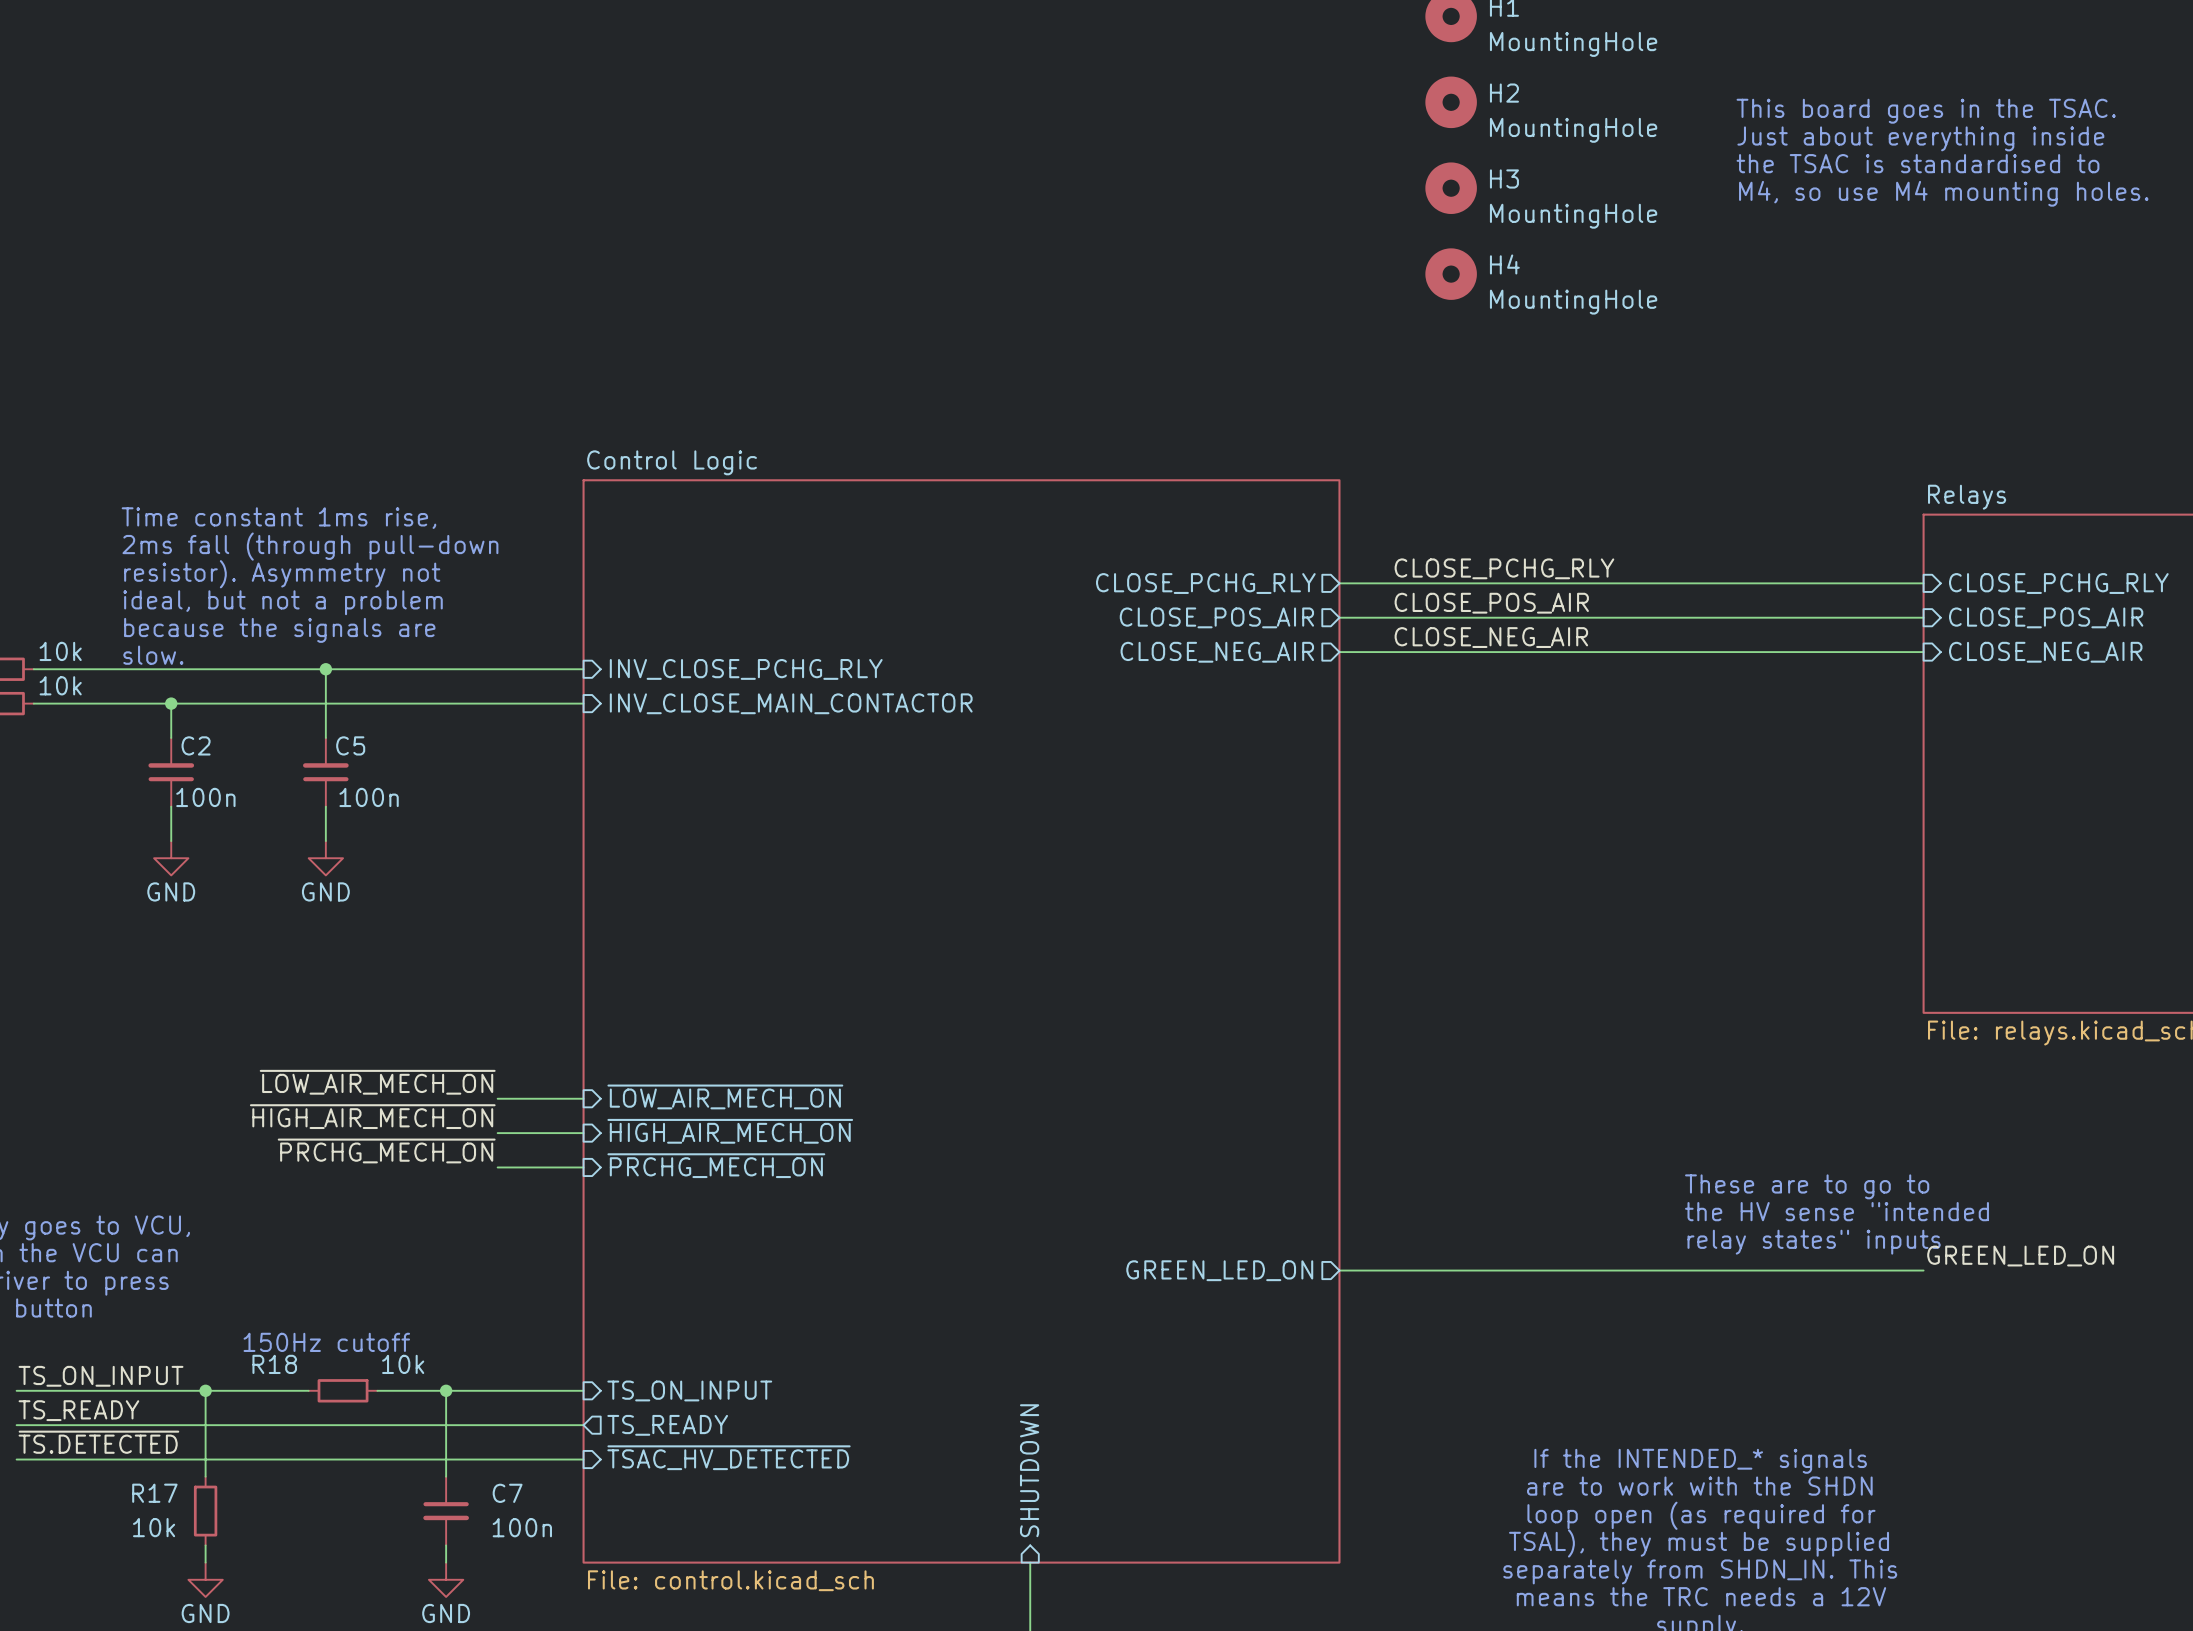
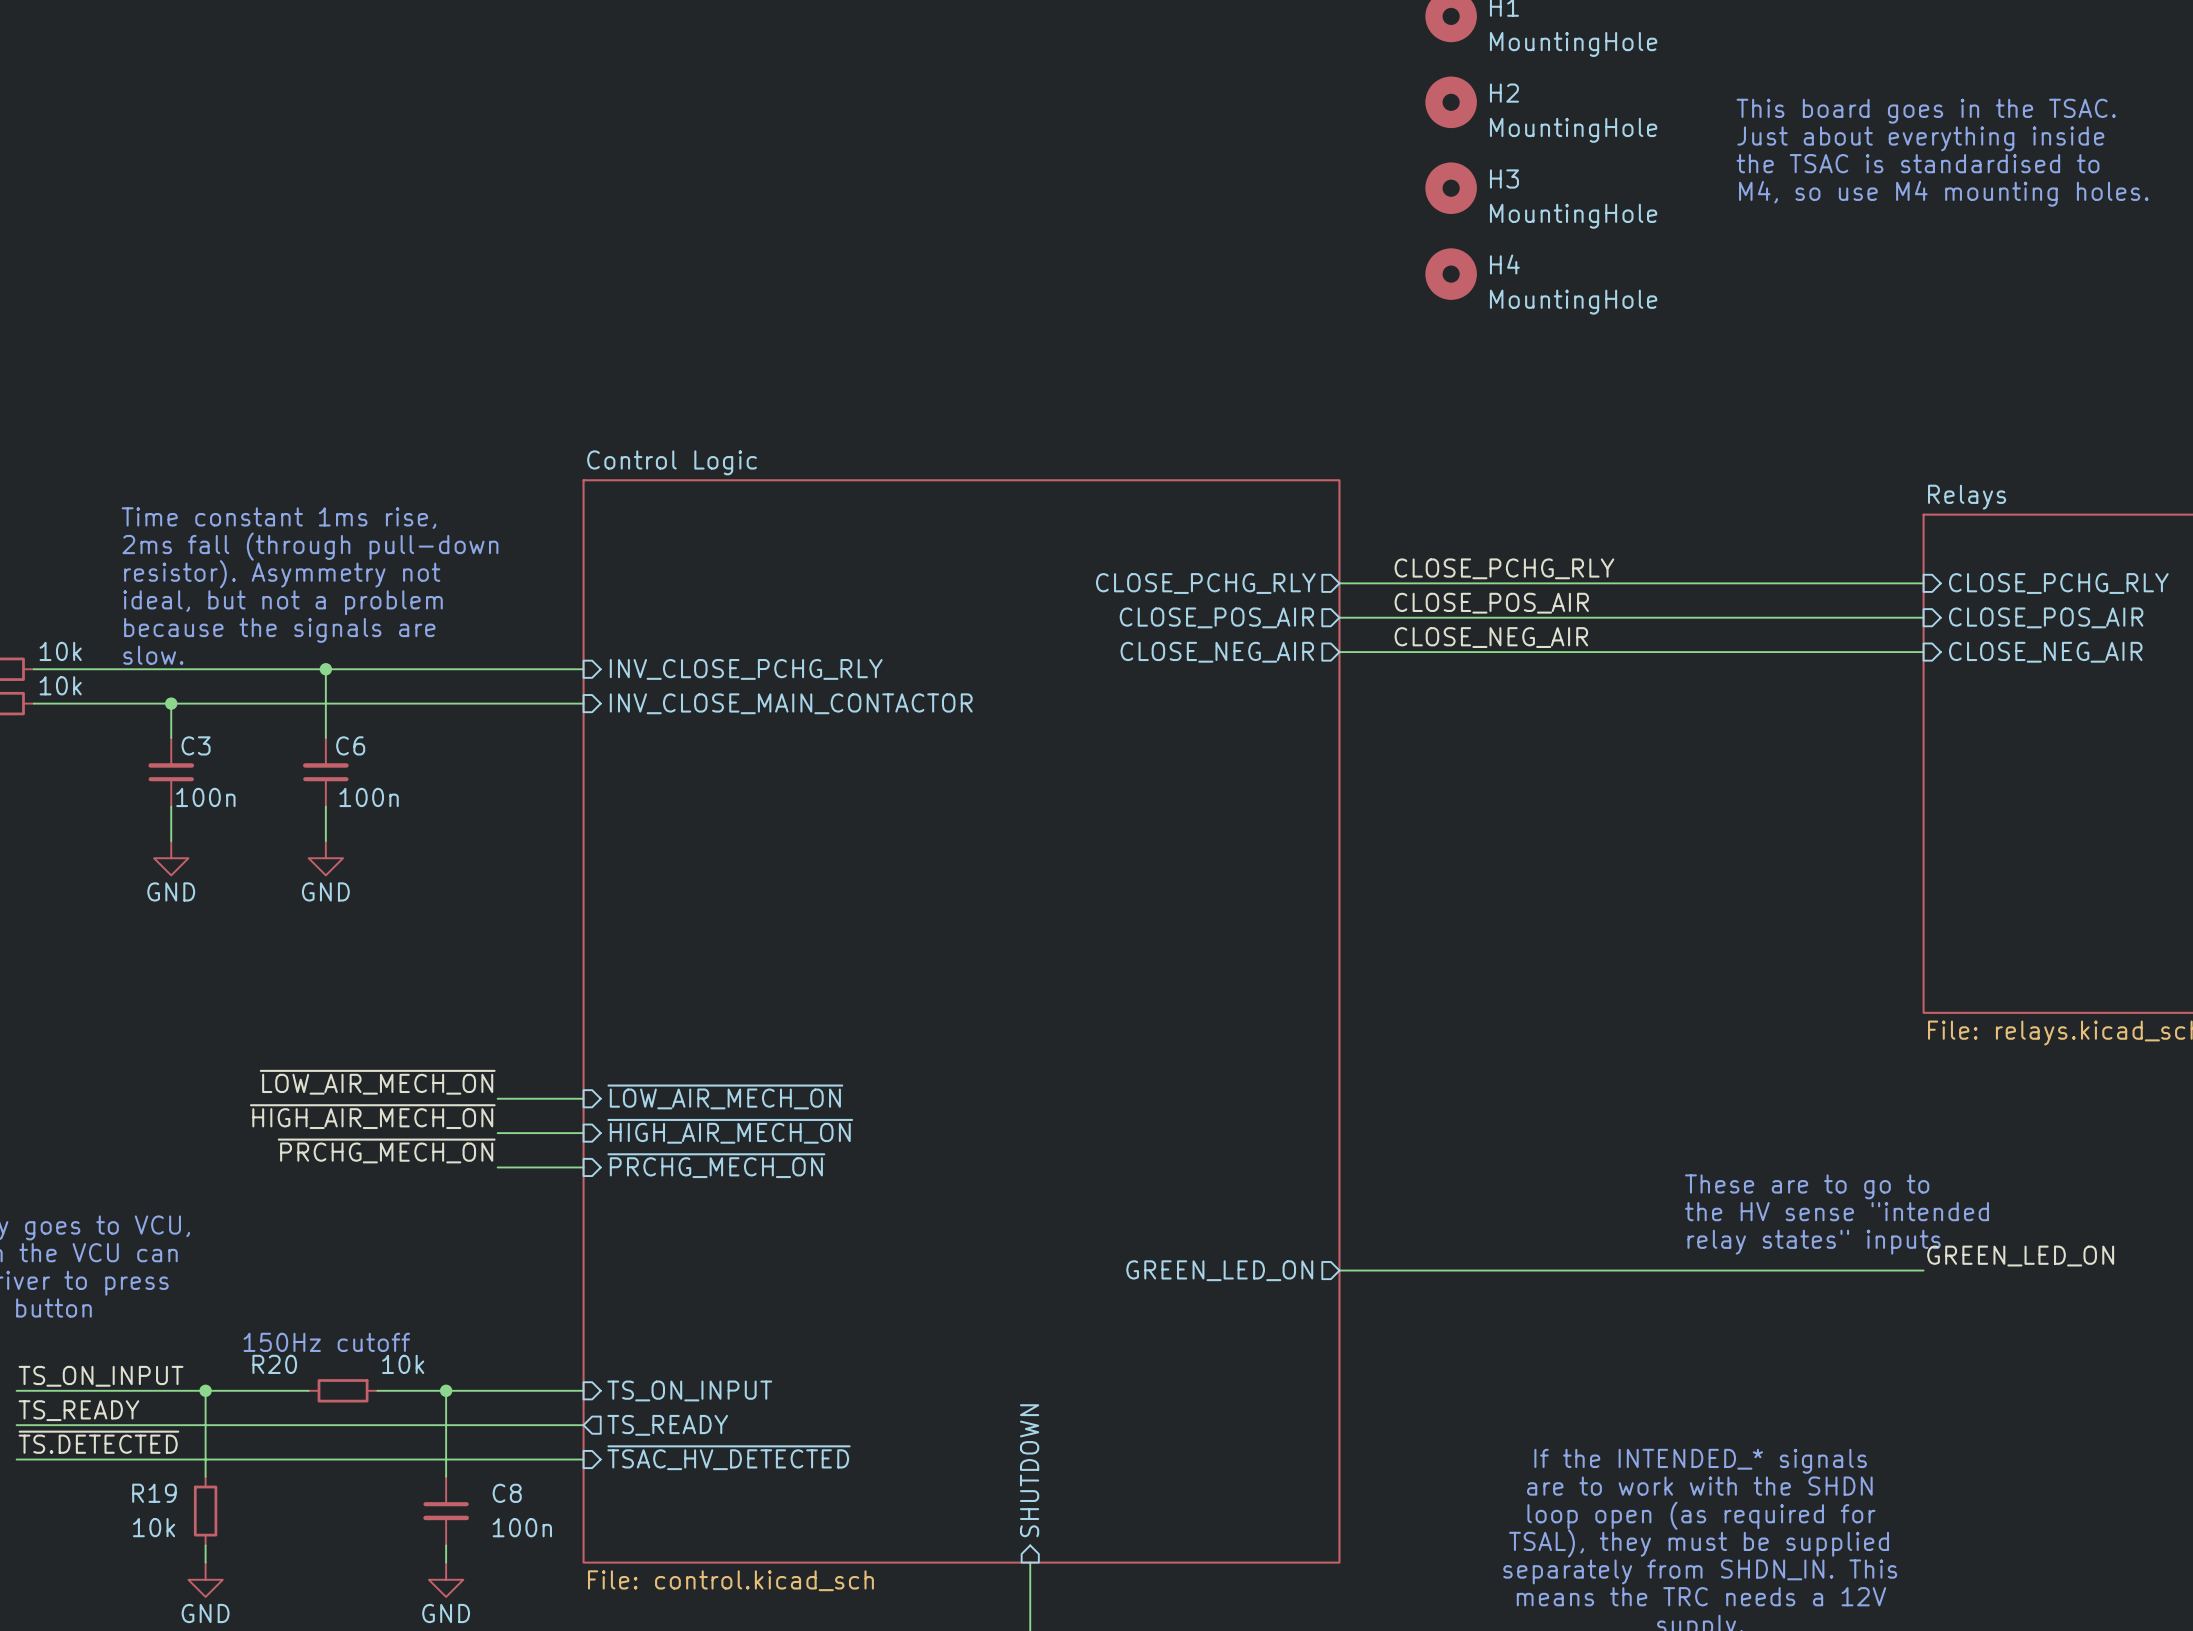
C2 name: C2 (196, 745) -> C3 (196, 745)
C5 name: C5 (350, 745) -> C6 (350, 745)
R18 name: R18 (274, 1364) -> R20 (274, 1364)
R17 name: R17 (154, 1493) -> R19 (154, 1493)
C7 name: C7 (507, 1493) -> C8 (507, 1493)

